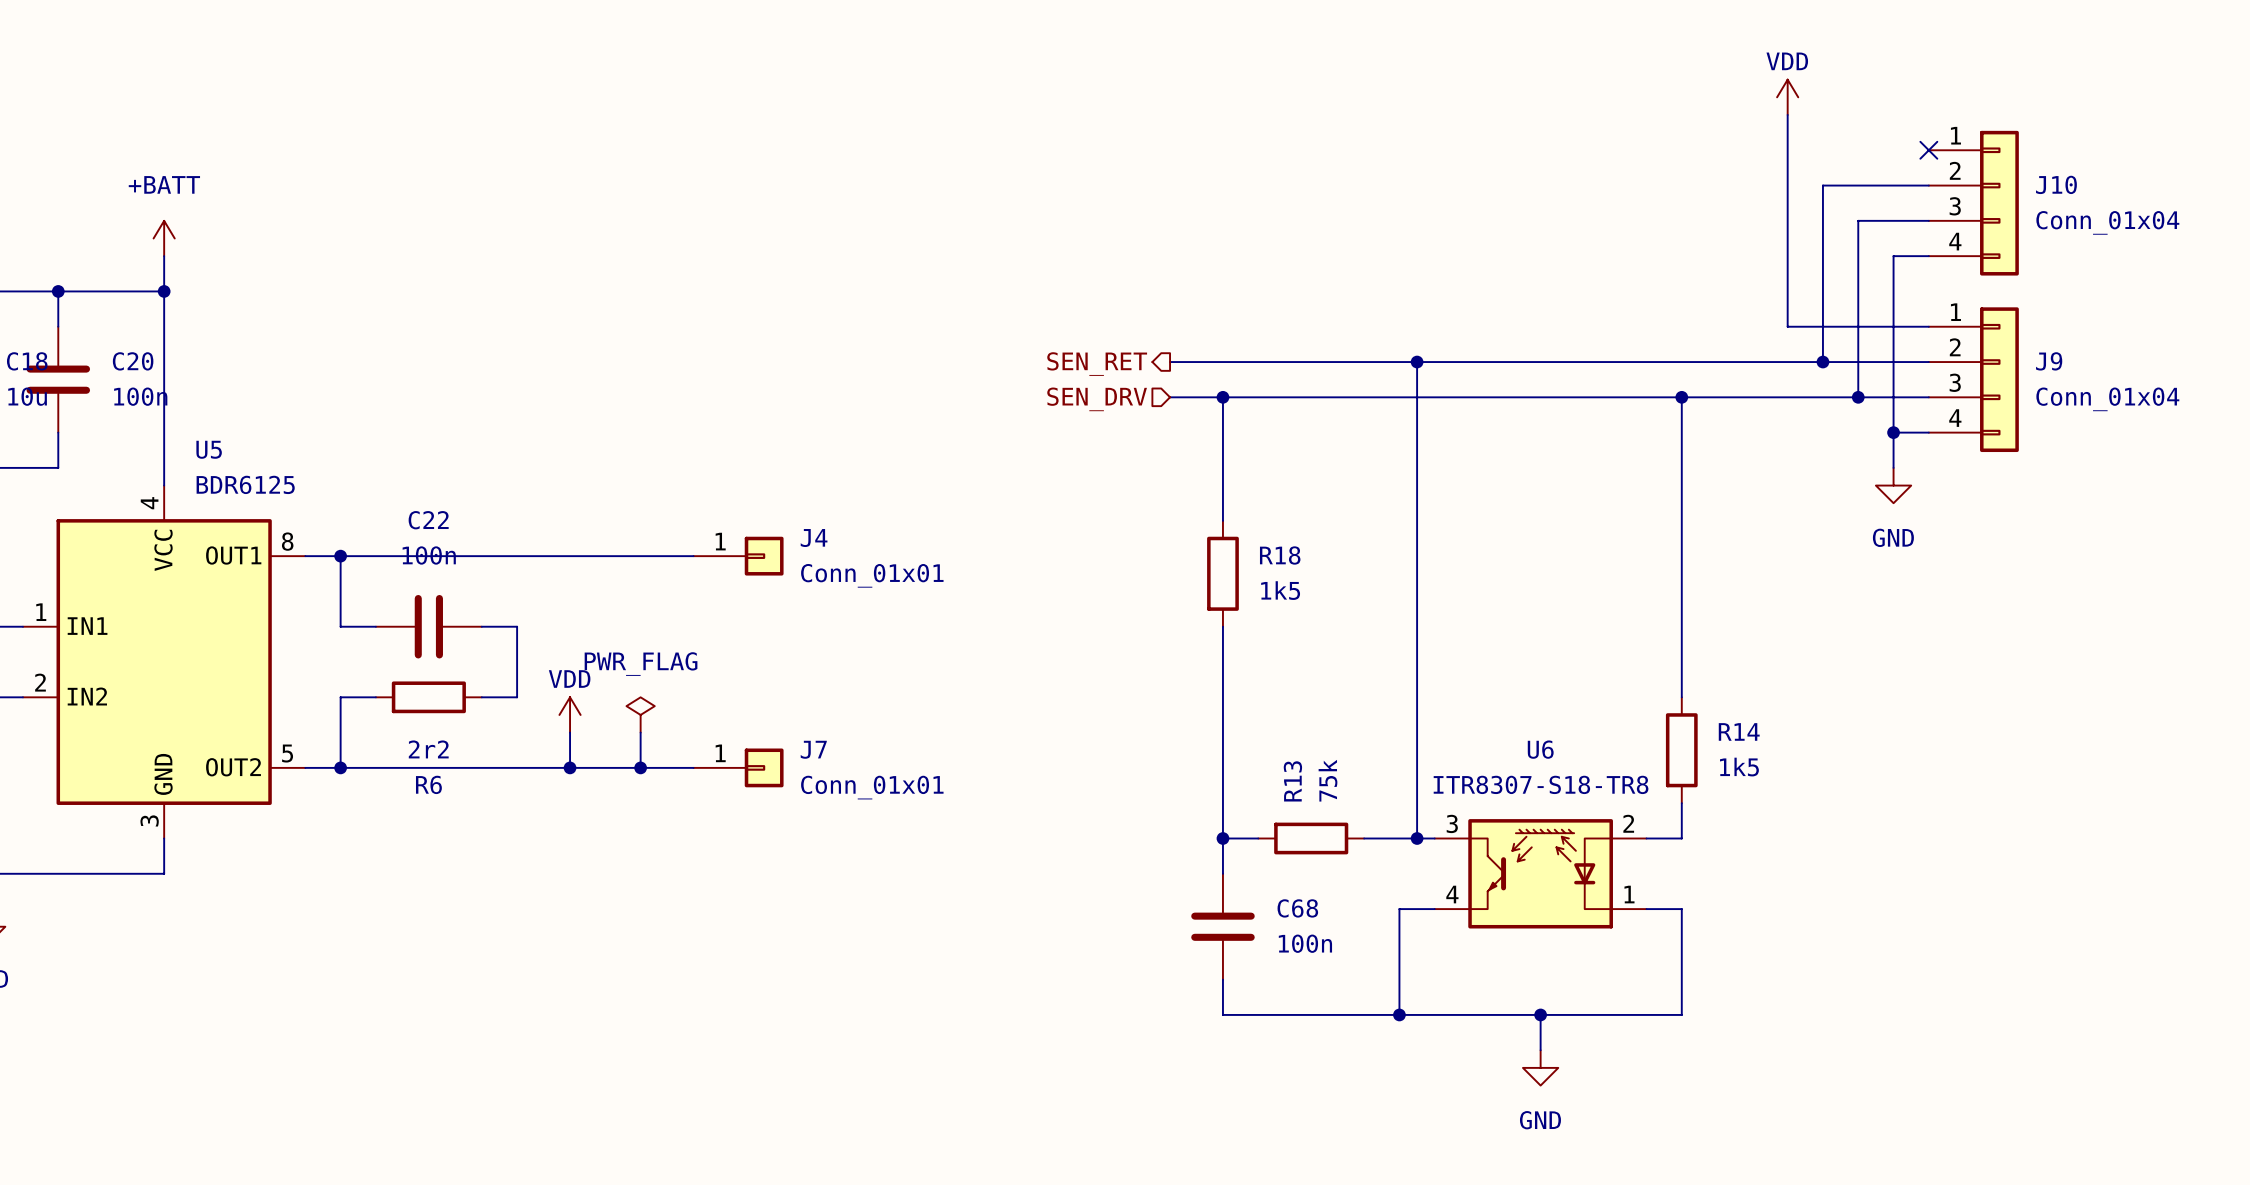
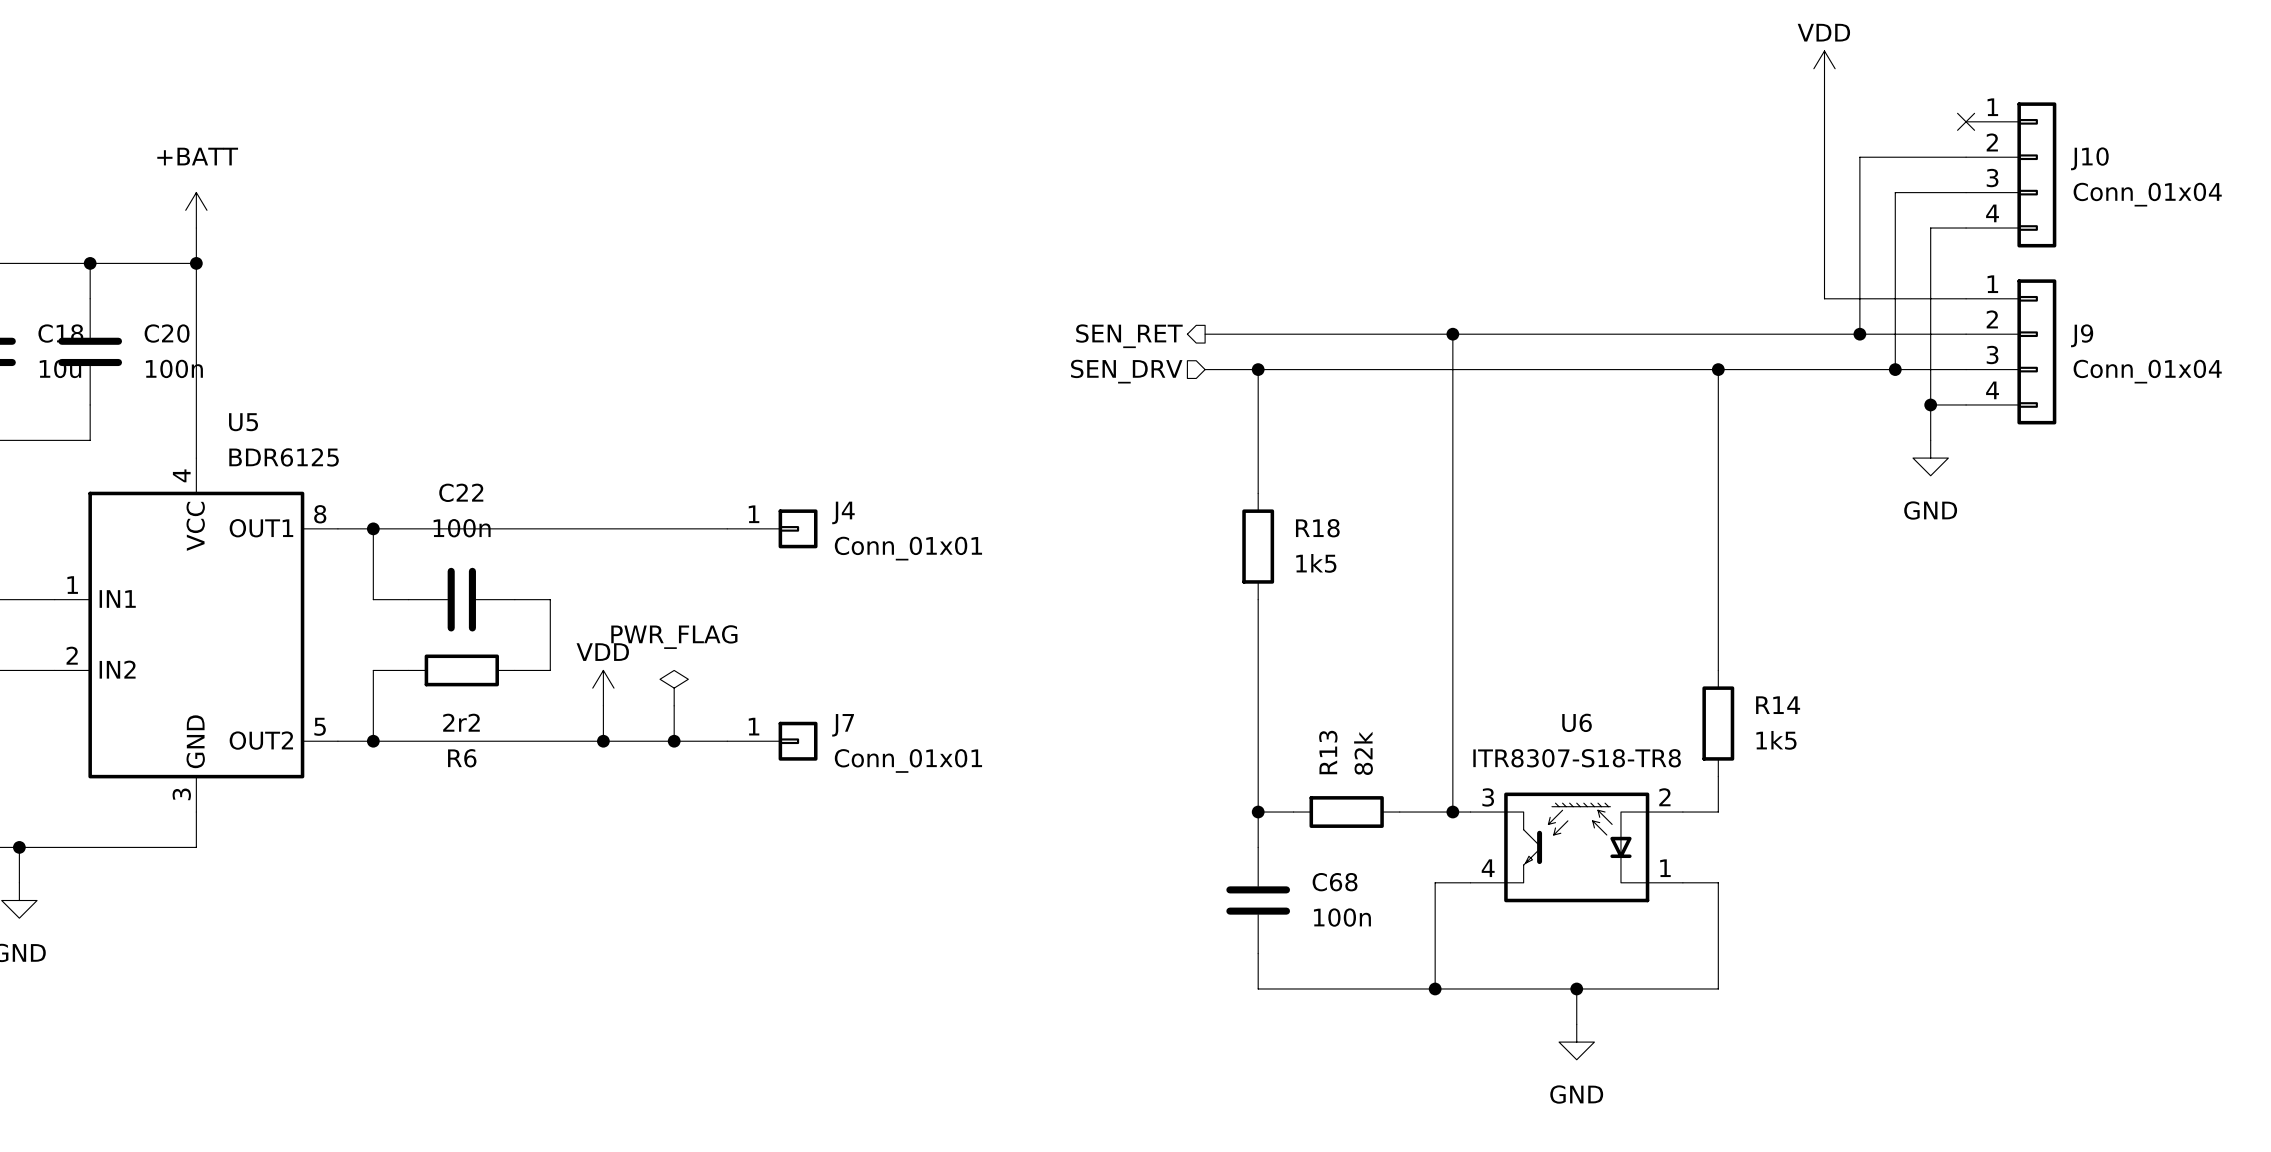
R13 value: 75k (1328, 780) -> 82k (1363, 753)

